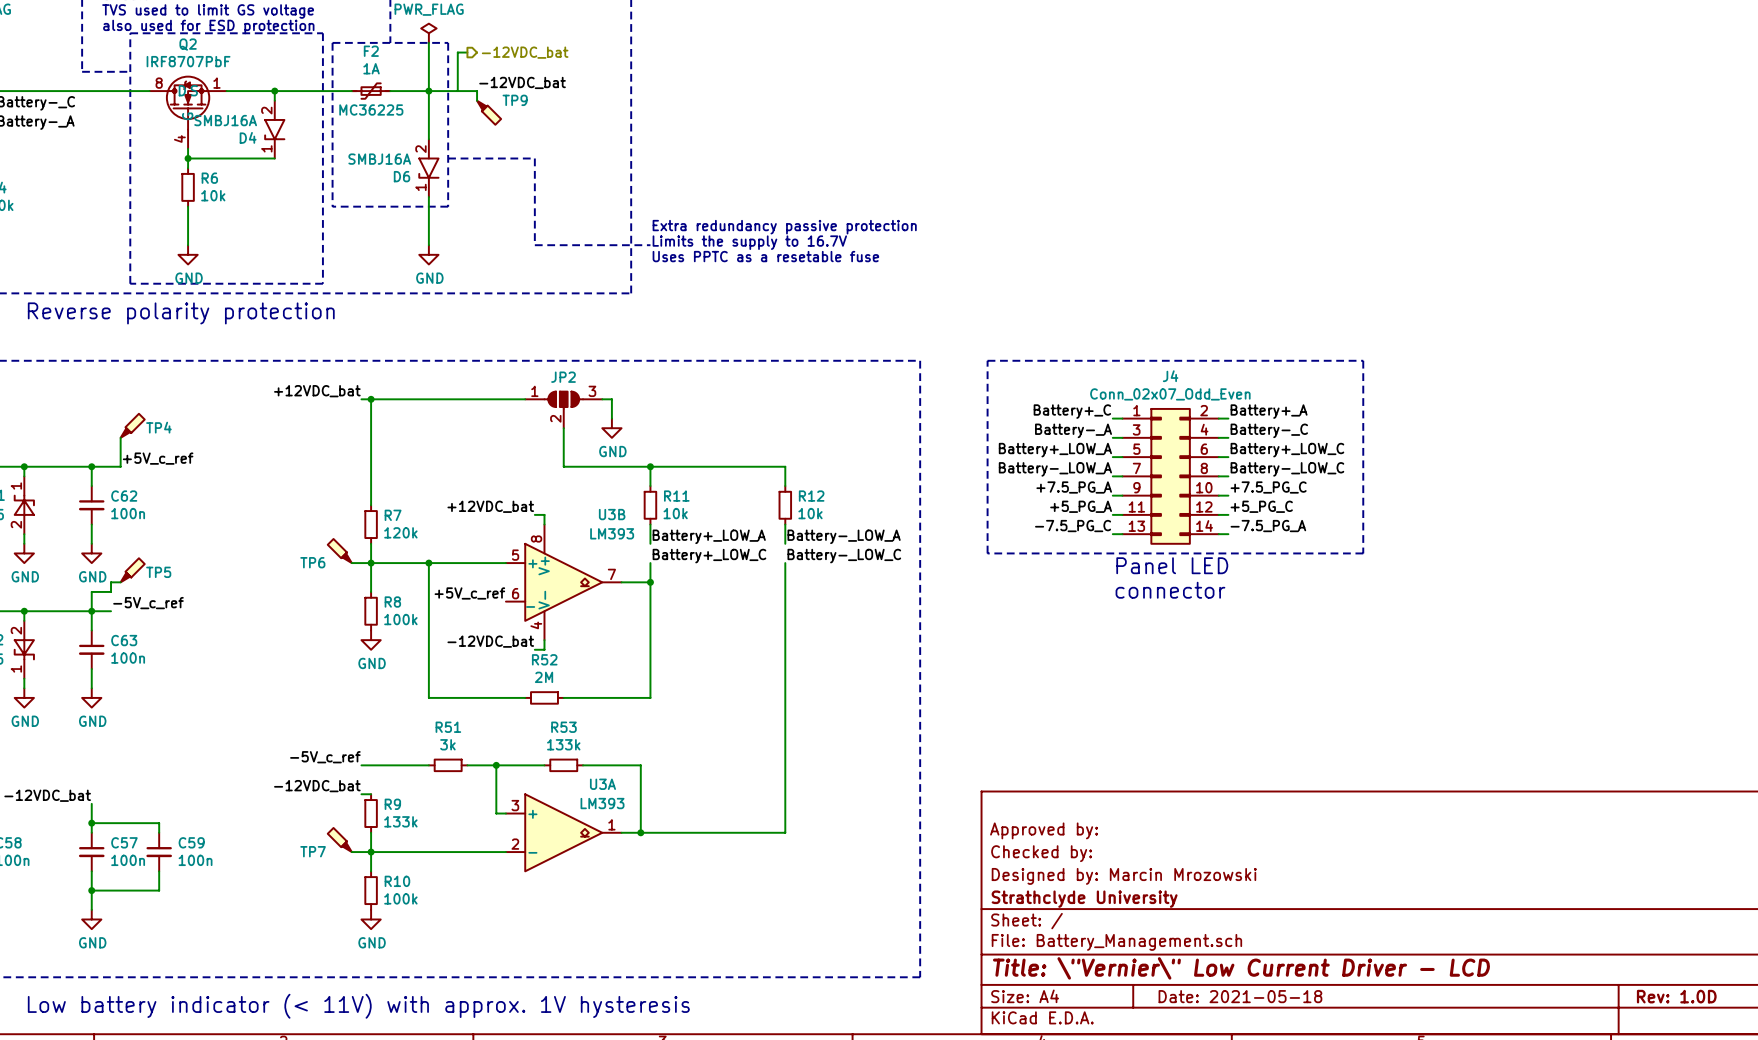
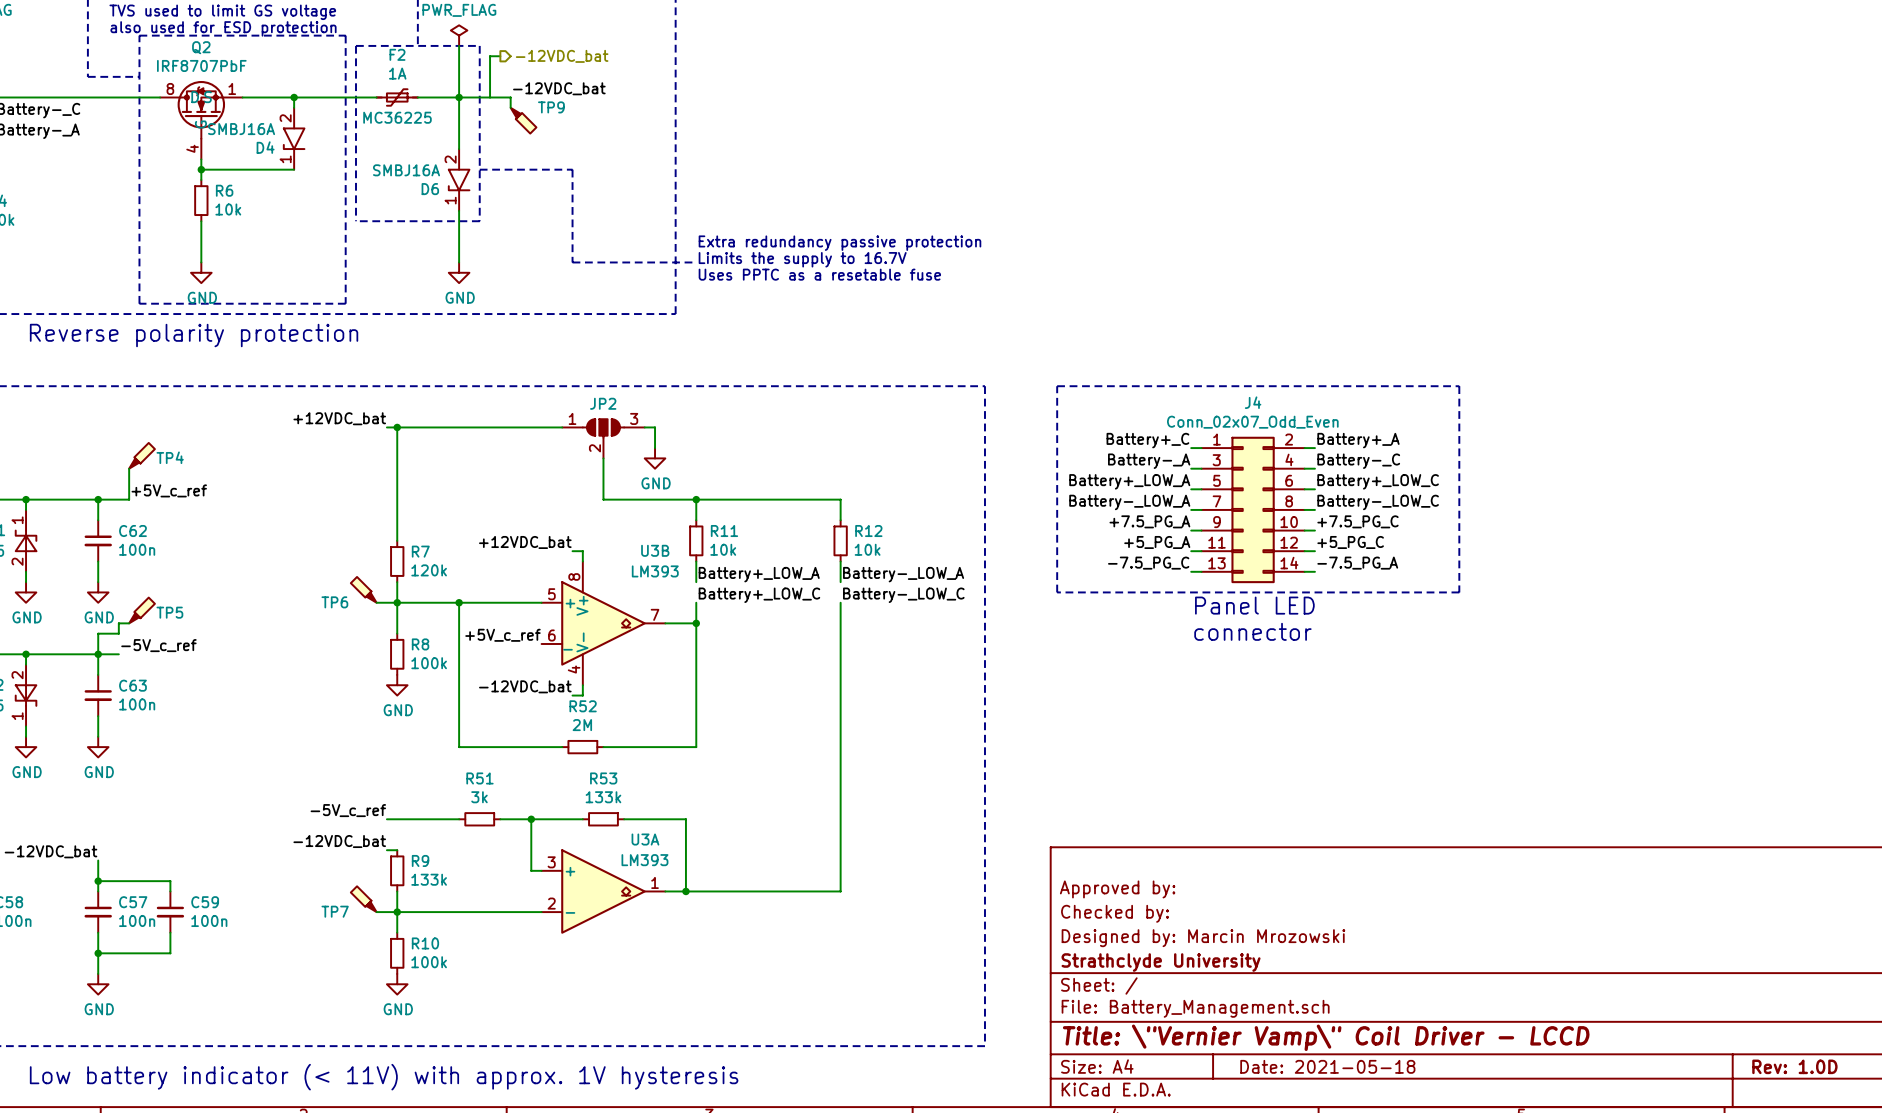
title block: Title: \"Vernier\" Low Current Driver - LCD (1241, 968) -> Title: \"Vernier Vamp\" Coil Driver - LCCD (1326, 1037)

